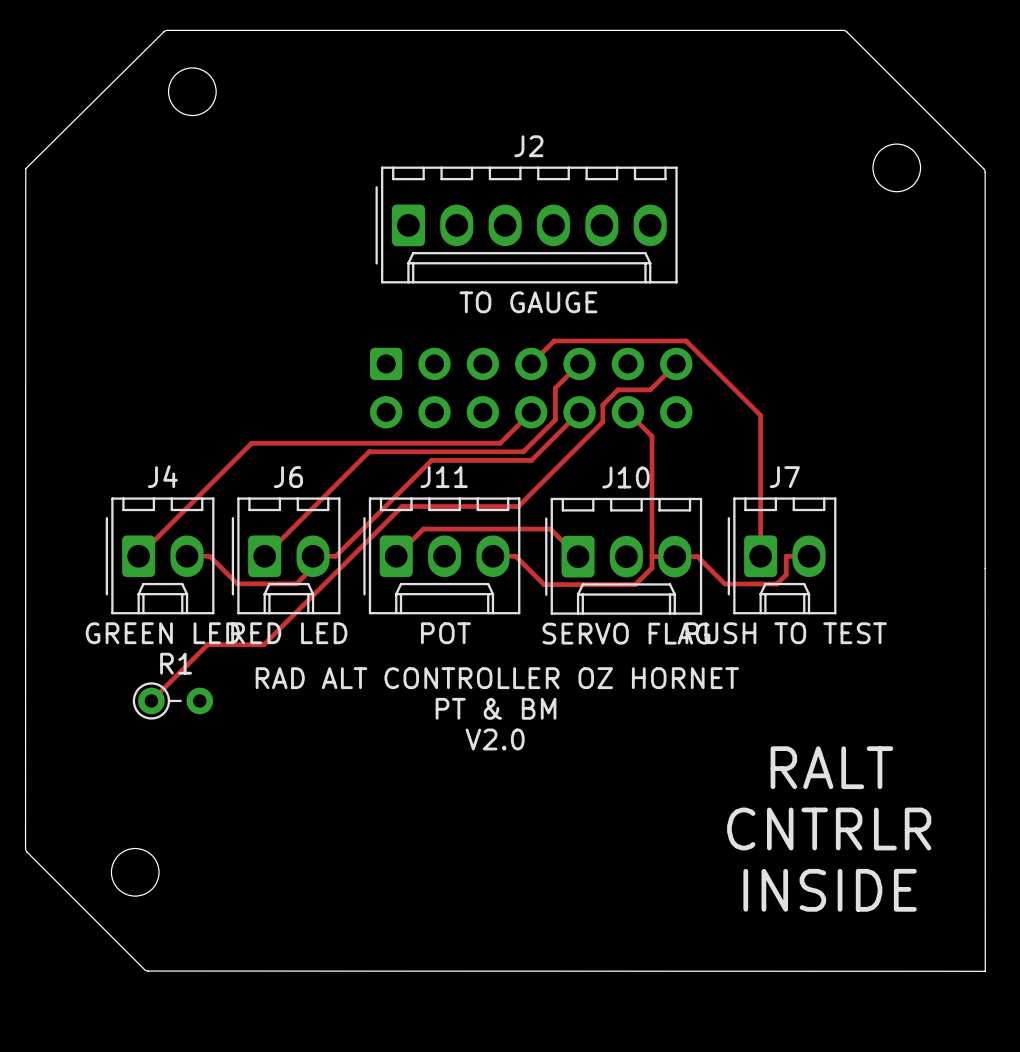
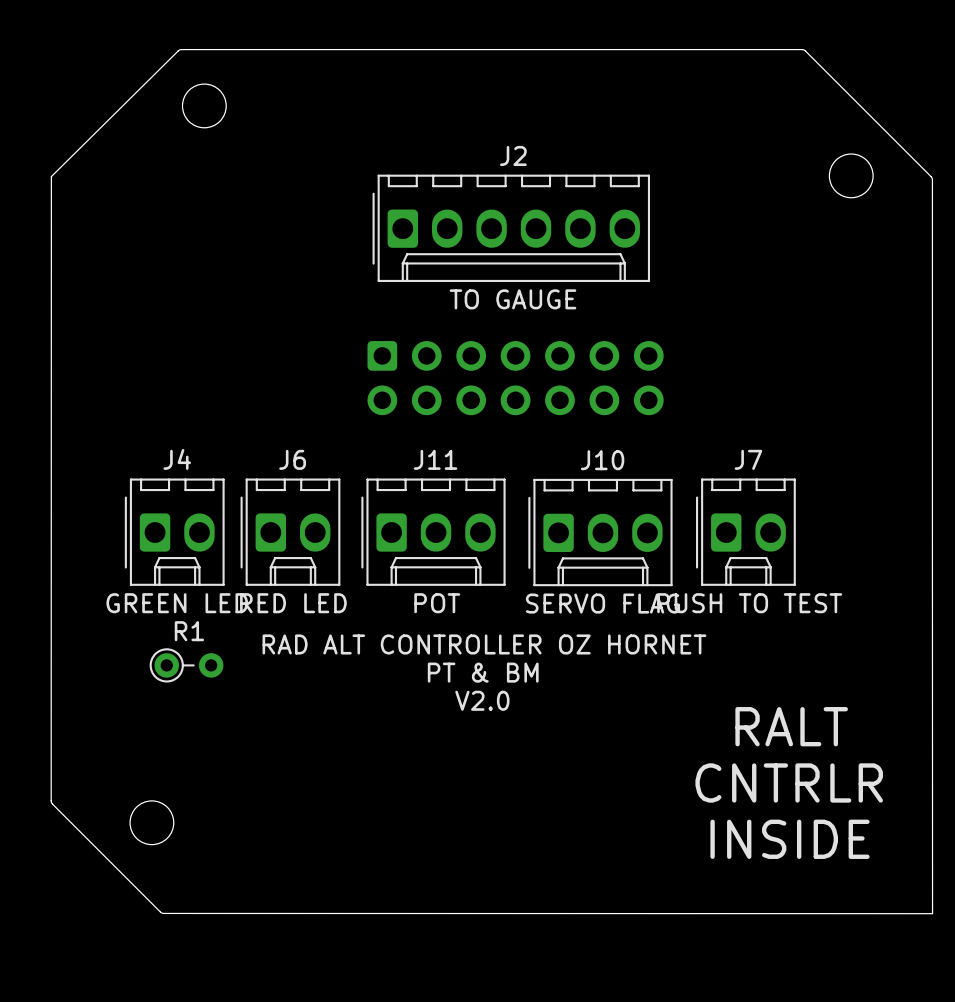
track: (531, 363) (554, 340) (686, 340) (760, 415) (760, 556) -> none
track: (579, 363) (555, 388) (555, 419) (523, 451) (369, 451) (264, 556) -> none
track: (676, 363) (650, 389) (617, 389) (602, 404) (602, 421) (518, 506) (402, 506) (263, 644) (207, 644) (151, 700) -> none
track: (531, 412) (500, 443) (251, 443) (138, 556) -> none
track: (579, 412) (531, 460) (431, 460) (335, 556) (313, 556) -> none
track: (627, 412) (652, 436) (652, 568) (635, 584) (544, 584) (515, 556) (492, 556) -> none
track: (187, 556) (209, 556) (237, 583) (296, 583) (324, 556) -> none
track: (396, 556) (423, 529) (550, 529) (578, 556) -> none
track: (809, 556) (786, 556) (786, 574) (776, 584) (724, 584) (697, 556) (652, 556) -> none

